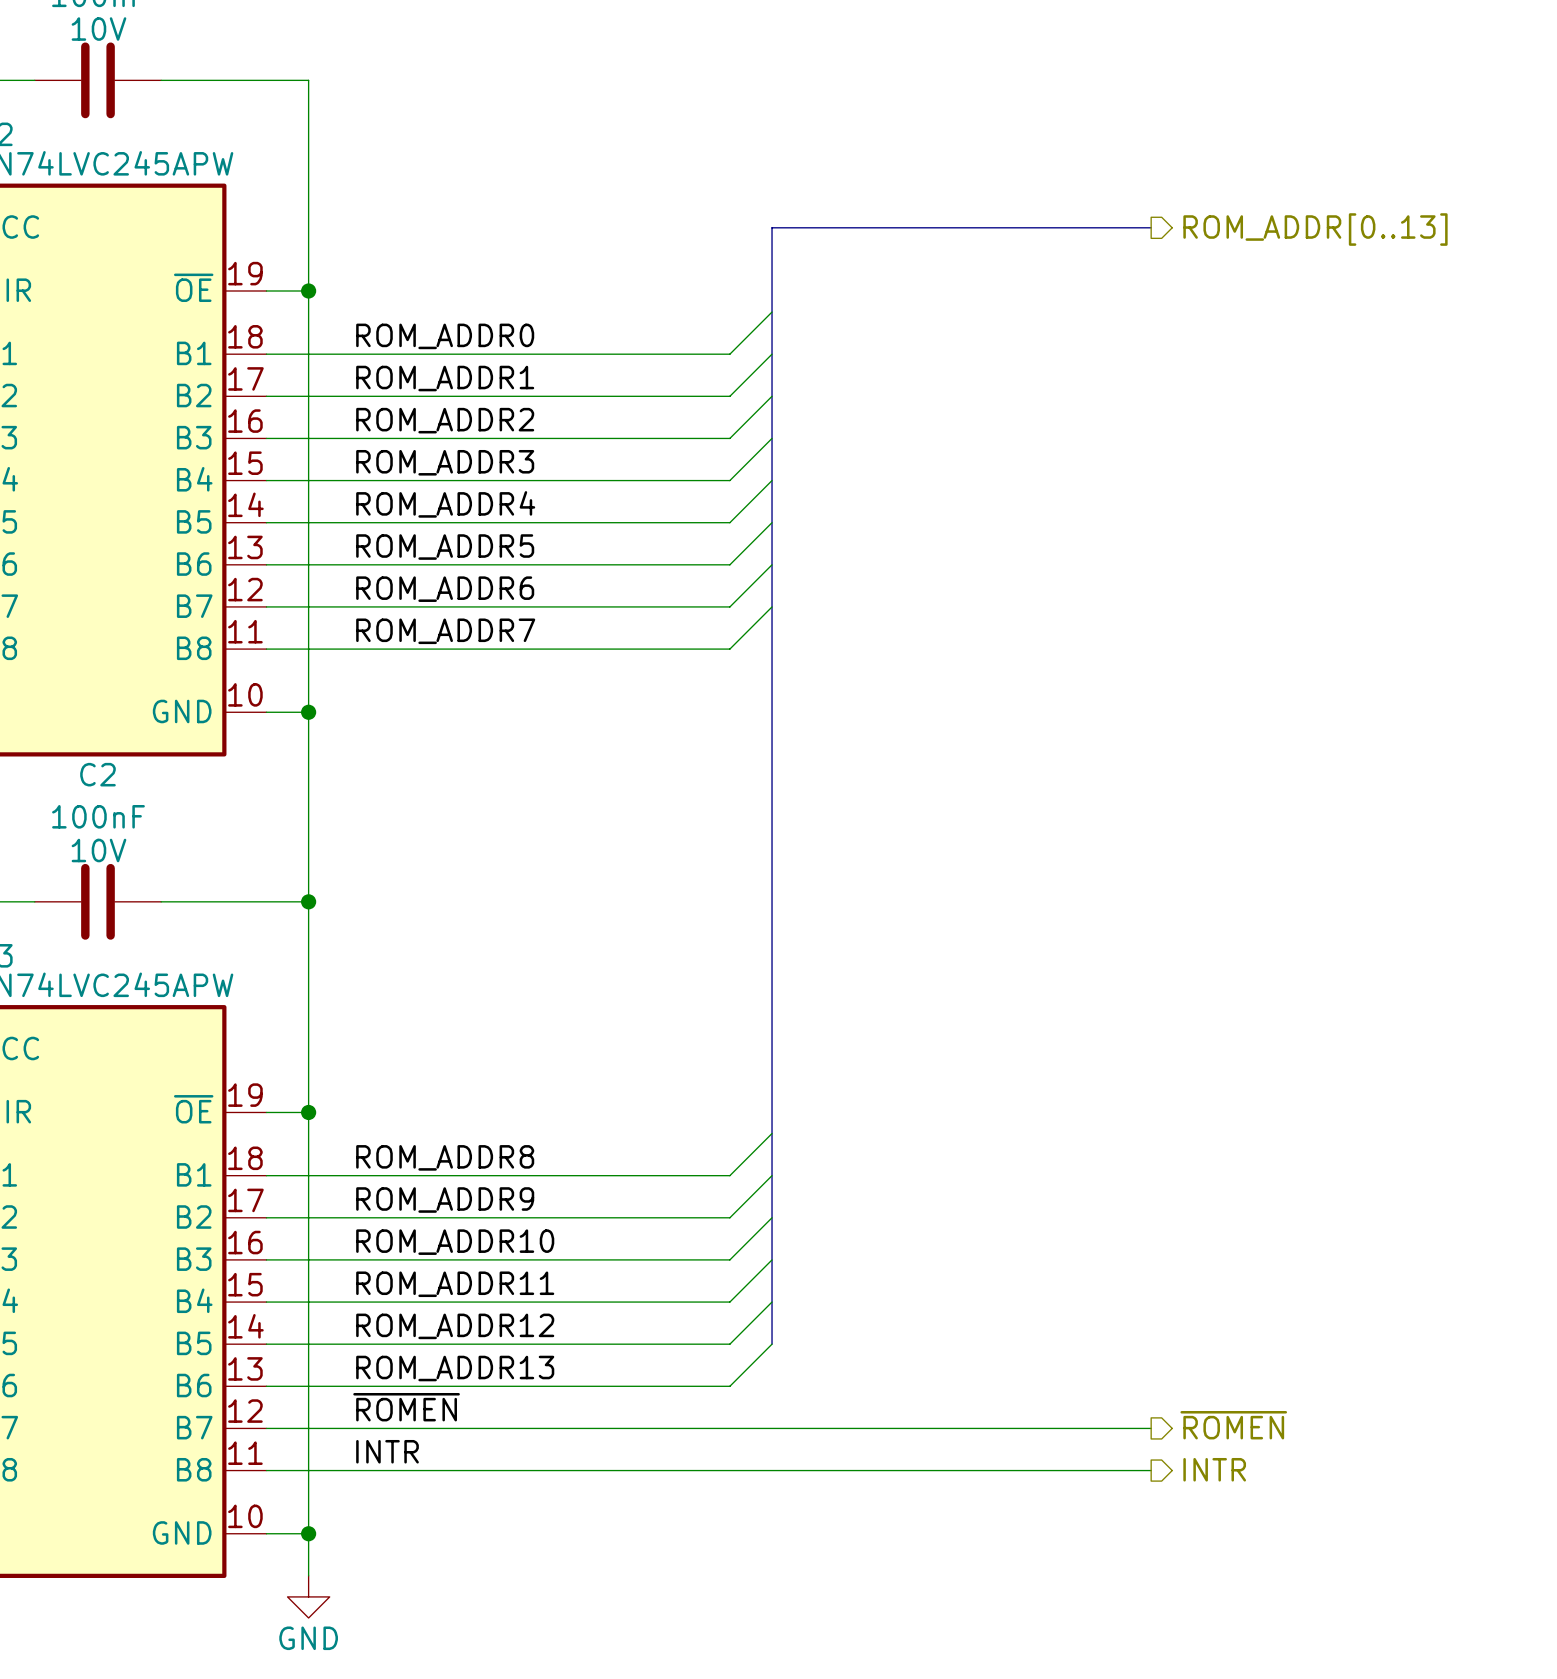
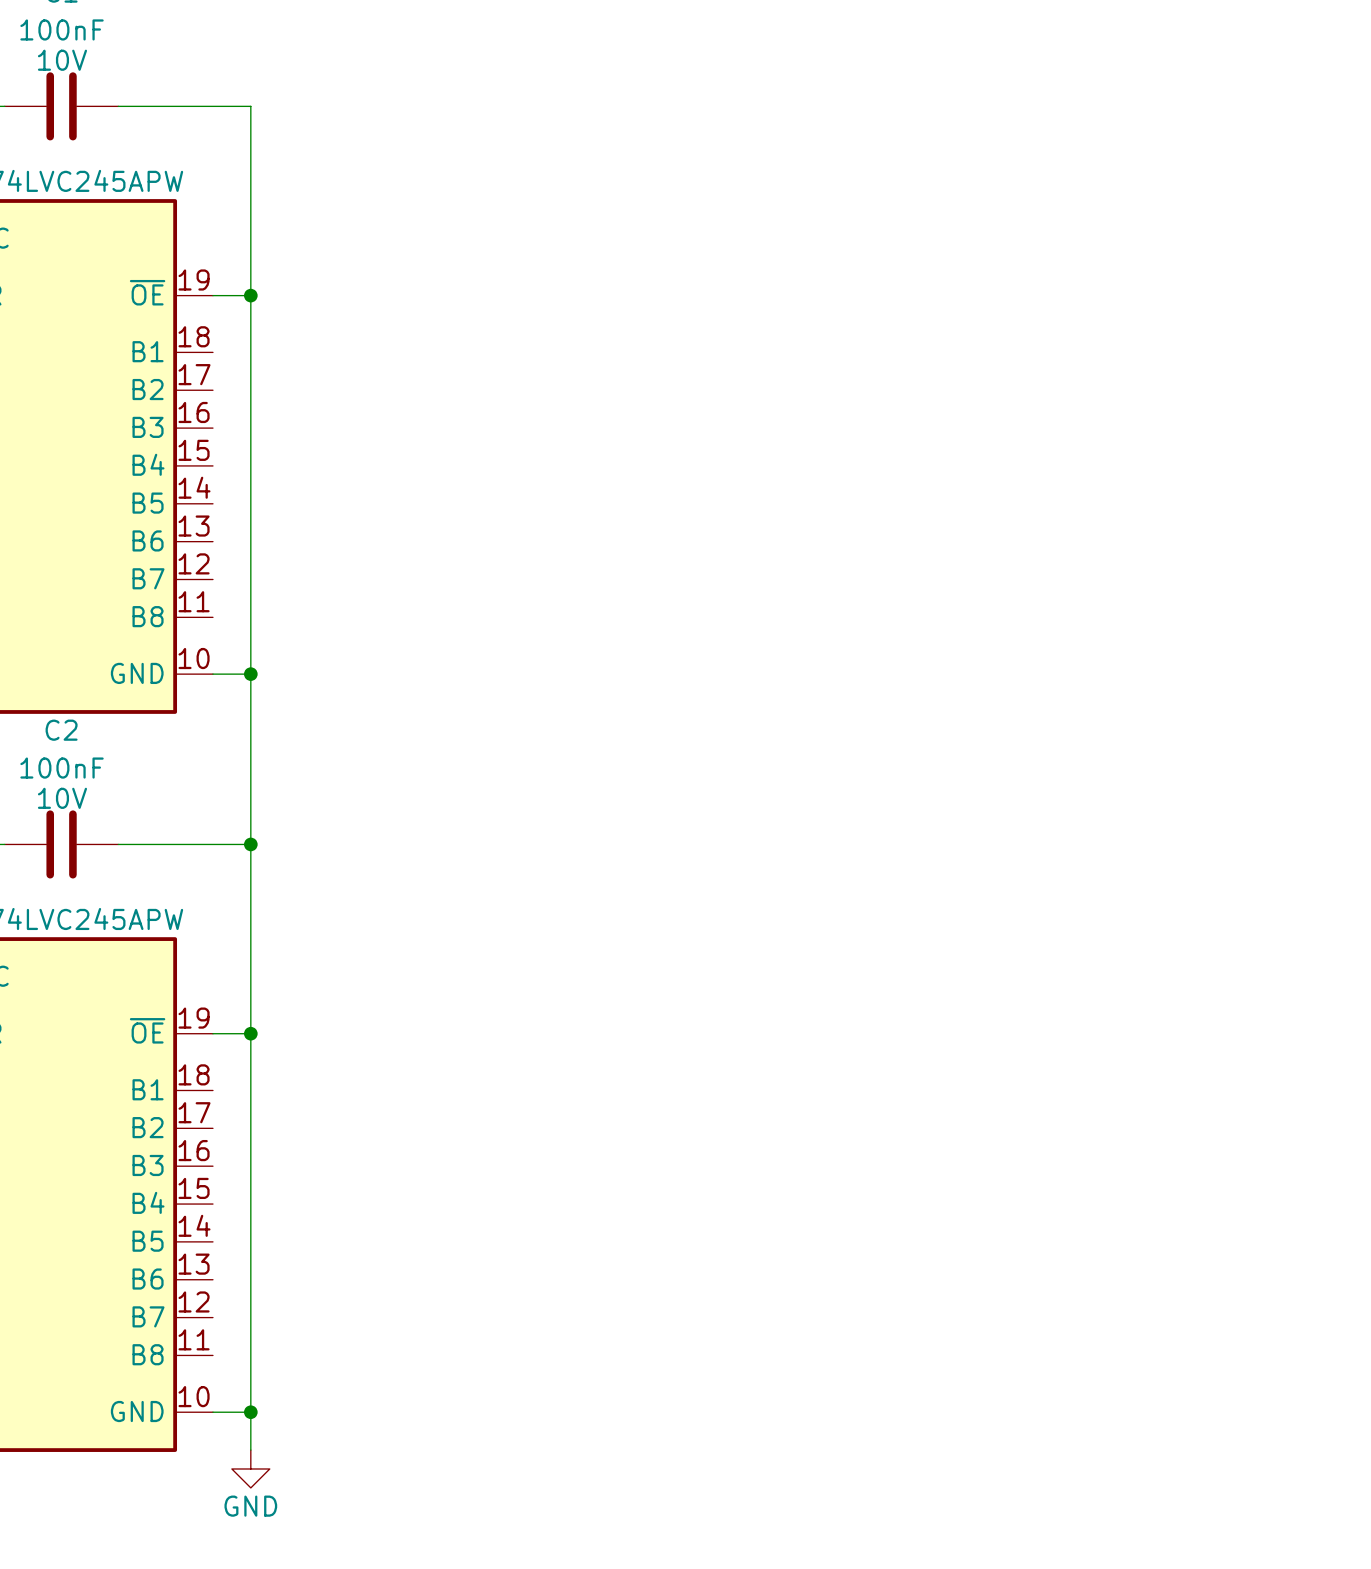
bus: (1151, 227) (772, 227) (772, 1344) -> none
hierarchical label: ROM_ADDR[0..13] (1315, 229) -> none
wire: (772, 312) (729, 354) (266, 354) -> none
label: ROM_ADDR0 (445, 336) -> none
wire: (772, 354) (729, 396) (266, 396) -> none
label: ROM_ADDR1 (445, 378) -> none
wire: (772, 396) (729, 438) (266, 438) -> none
label: ROM_ADDR2 (445, 420) -> none
wire: (772, 438) (729, 480) (266, 480) -> none
label: ROM_ADDR3 (445, 462) -> none
wire: (772, 480) (729, 522) (266, 522) -> none
label: ROM_ADDR4 (445, 504) -> none
wire: (772, 522) (729, 564) (266, 564) -> none
label: ROM_ADDR5 (445, 547) -> none
wire: (772, 564) (729, 606) (266, 606) -> none
label: ROM_ADDR6 (445, 589) -> none
wire: (772, 606) (729, 649) (266, 649) -> none
label: ROM_ADDR7 (445, 631) -> none
wire: (772, 1133) (729, 1175) (266, 1175) -> none
label: ROM_ADDR8 (445, 1157) -> none
wire: (772, 1175) (729, 1217) (266, 1217) -> none
label: ROM_ADDR9 (445, 1200) -> none
wire: (772, 1217) (729, 1259) (266, 1259) -> none
label: ROM_ADDR10 (455, 1242) -> none
wire: (772, 1259) (729, 1302) (266, 1302) -> none
label: ROM_ADDR11 (455, 1284) -> none
wire: (772, 1302) (729, 1344) (266, 1344) -> none
label: ROM_ADDR12 (455, 1326) -> none
wire: (772, 1344) (729, 1386) (266, 1386) -> none
label: ROM_ADDR13 (455, 1368) -> none
label: ~{ROMEN} (406, 1407) -> none
hierarchical label: ~{ROMEN} (1233, 1425) -> none
wire: (266, 1428) (1151, 1428) -> none
label: INTR (387, 1451) -> none
hierarchical label: INTR (1214, 1469) -> none
wire: (266, 1470) (1151, 1470) -> none

